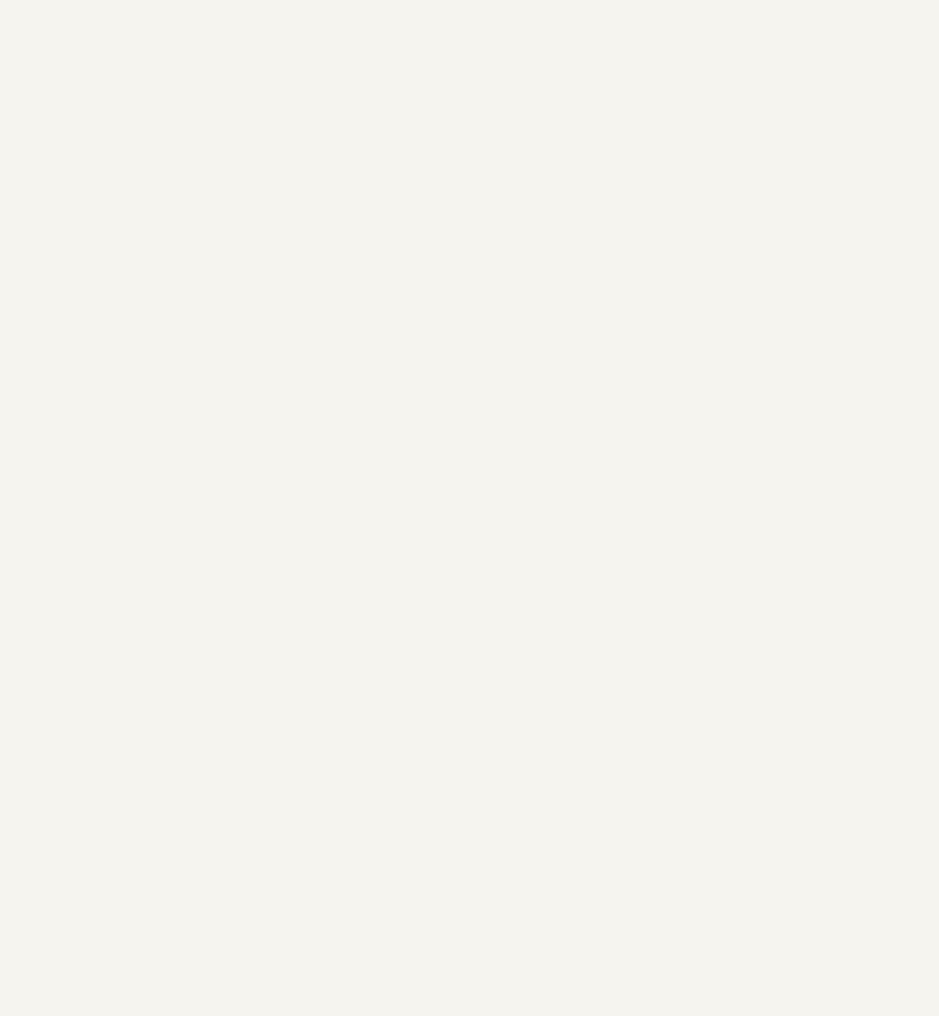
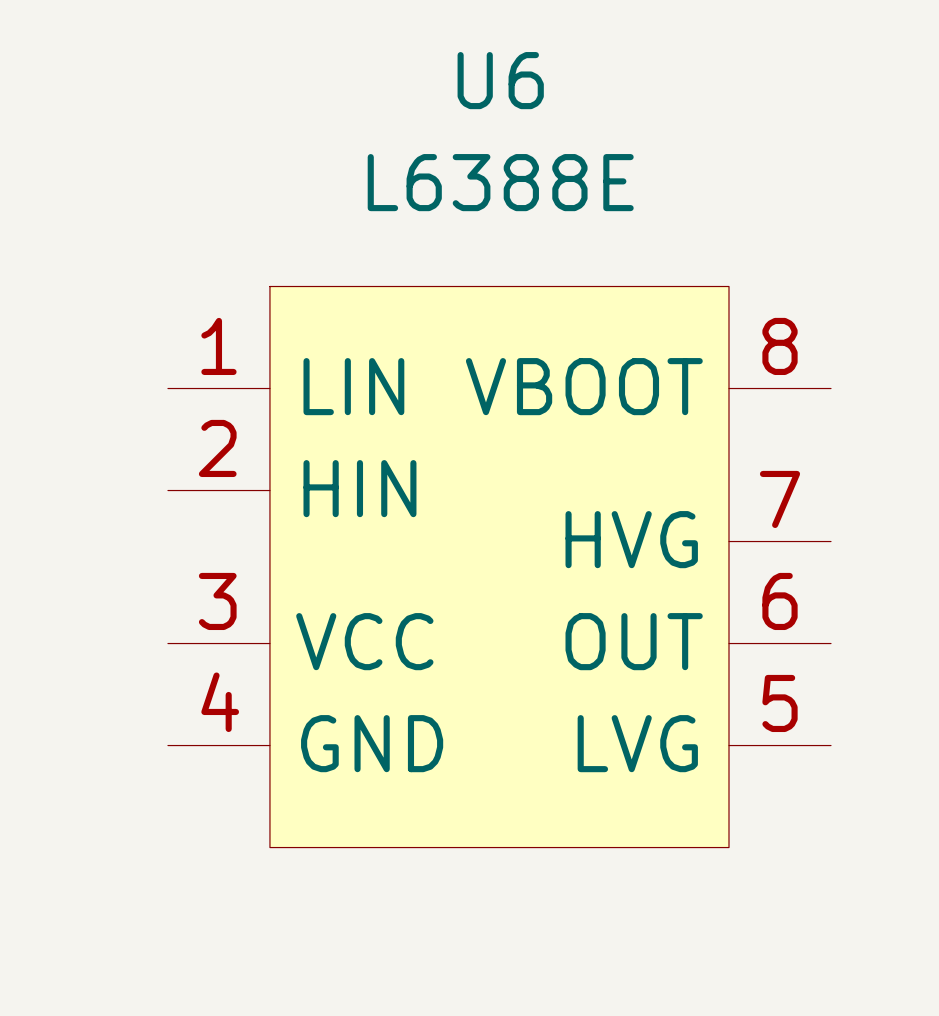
U6: none -> L6388E (499, 567)

